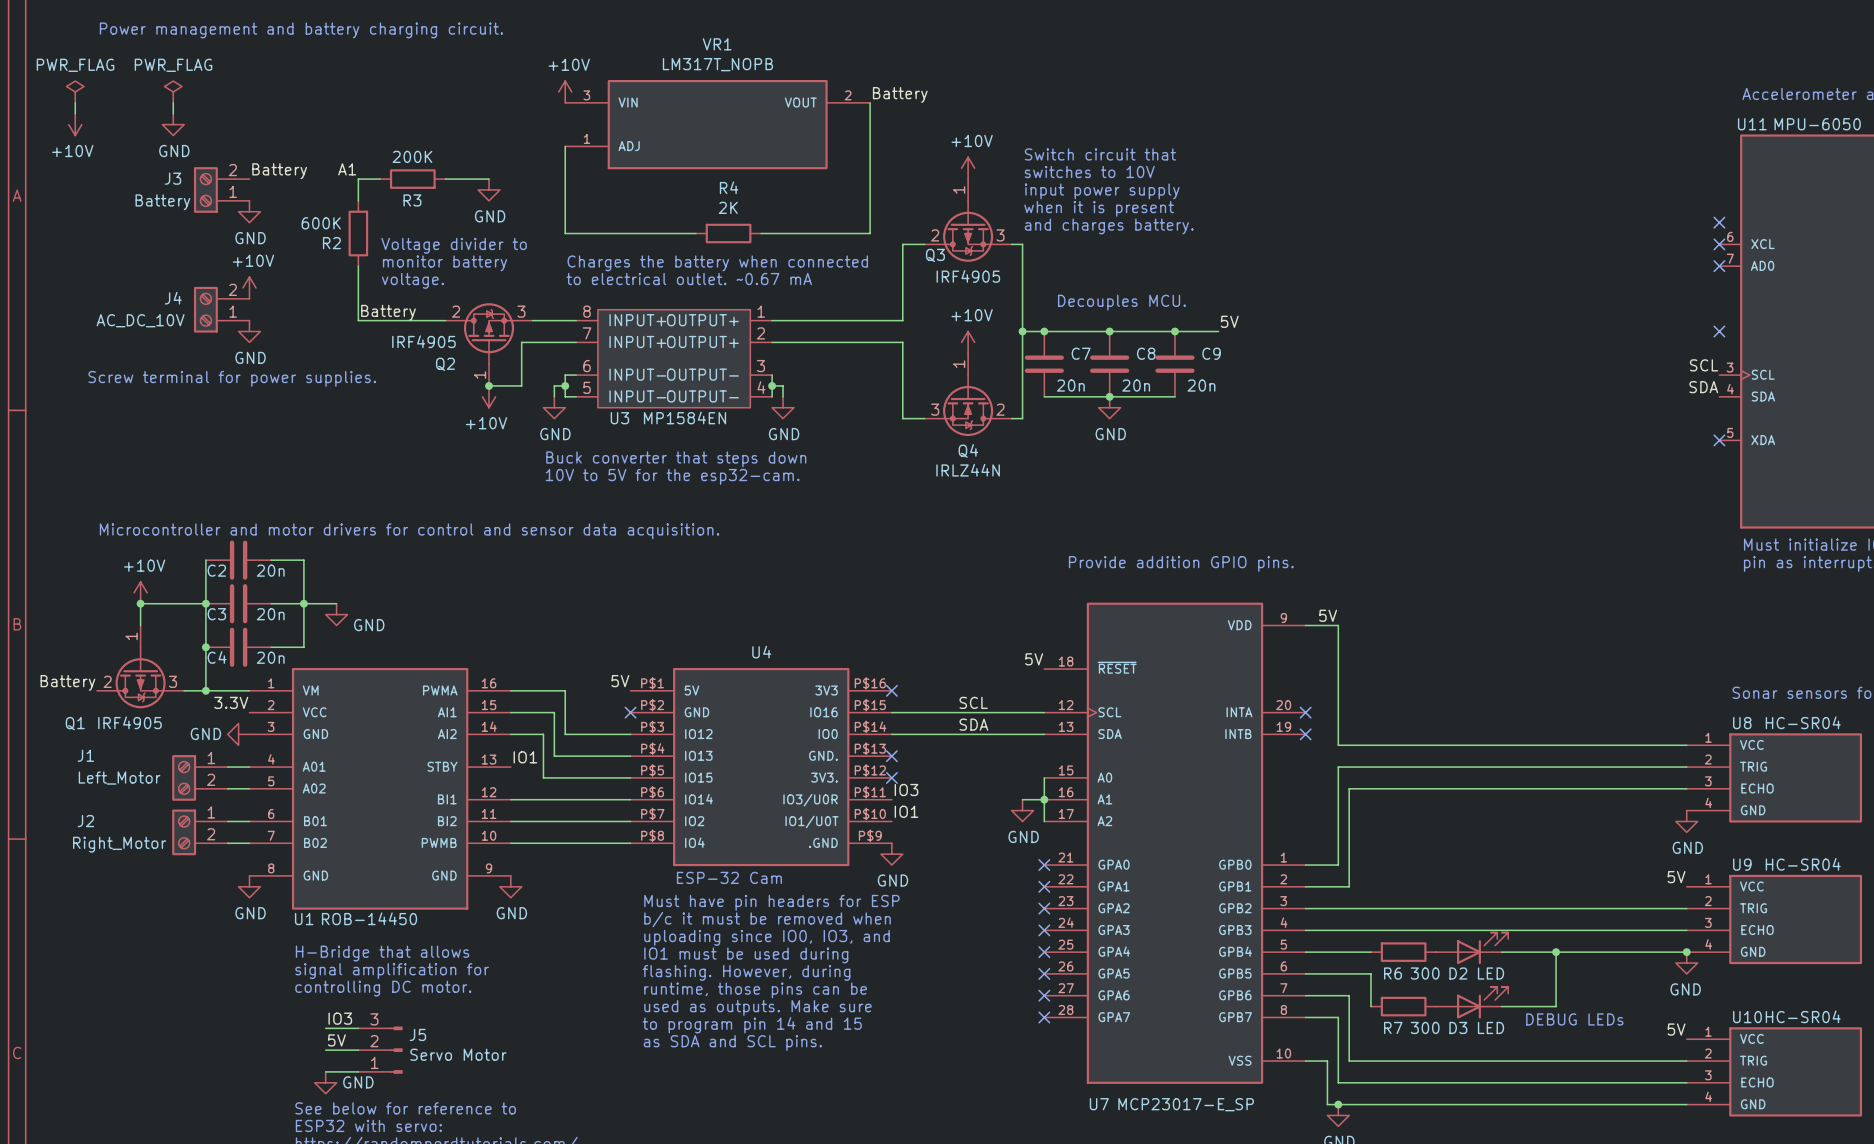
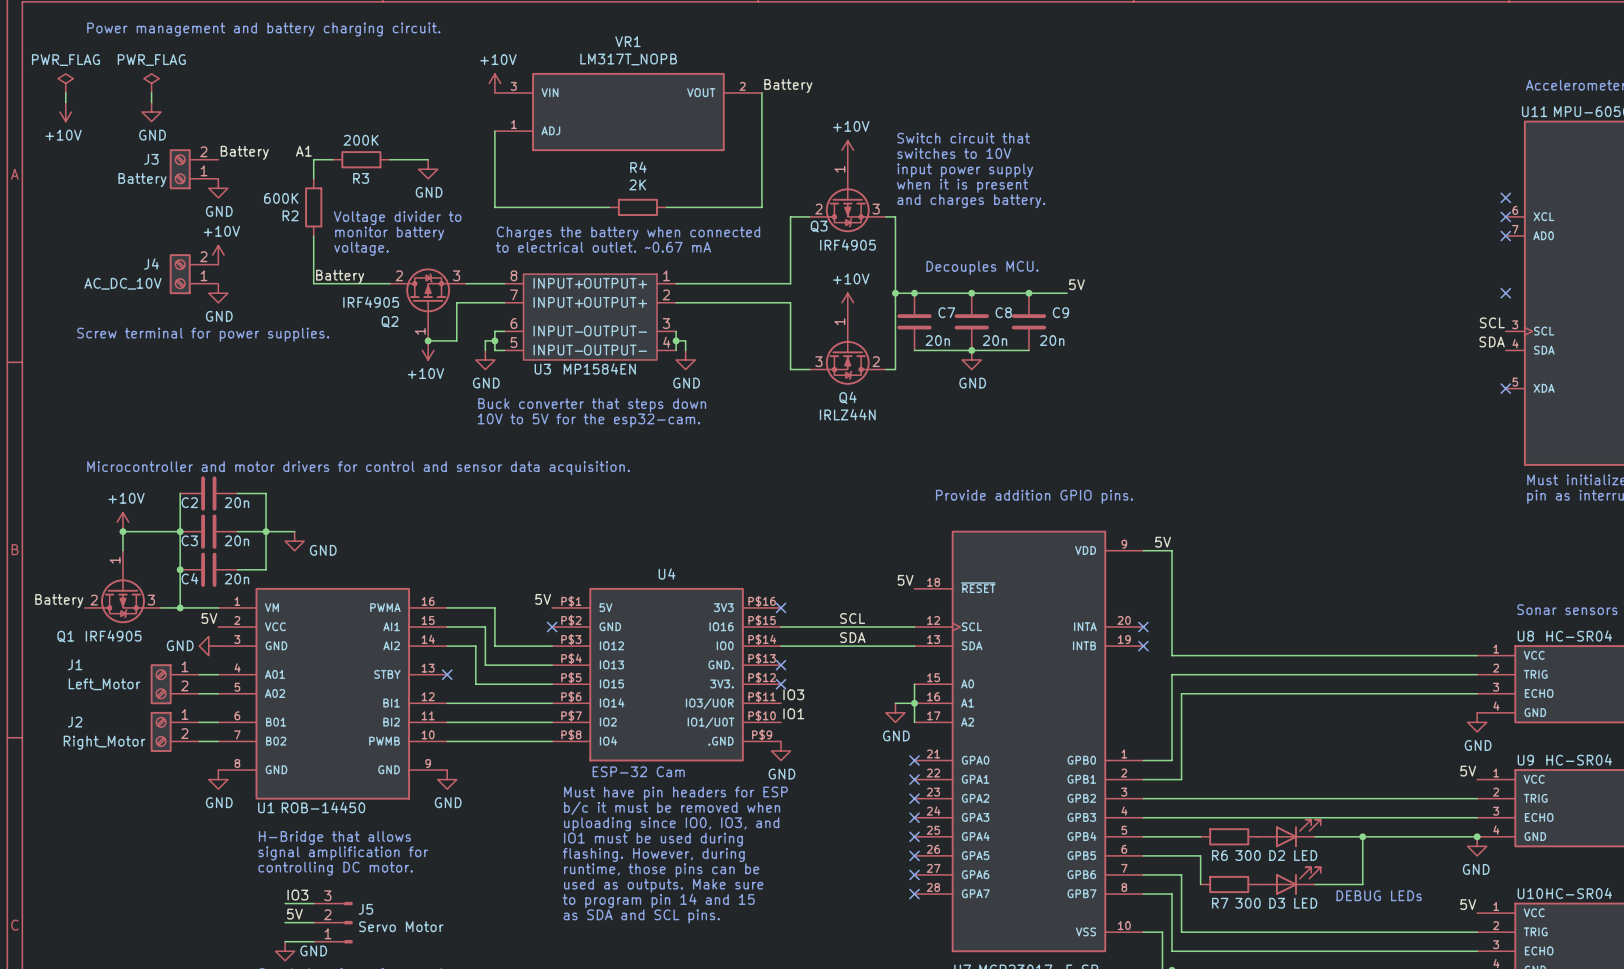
label: 3.3V (231, 702) -> 5V (209, 618)
label: IO1 (525, 757) -> none
no-connect mark: none -> (447, 674)

